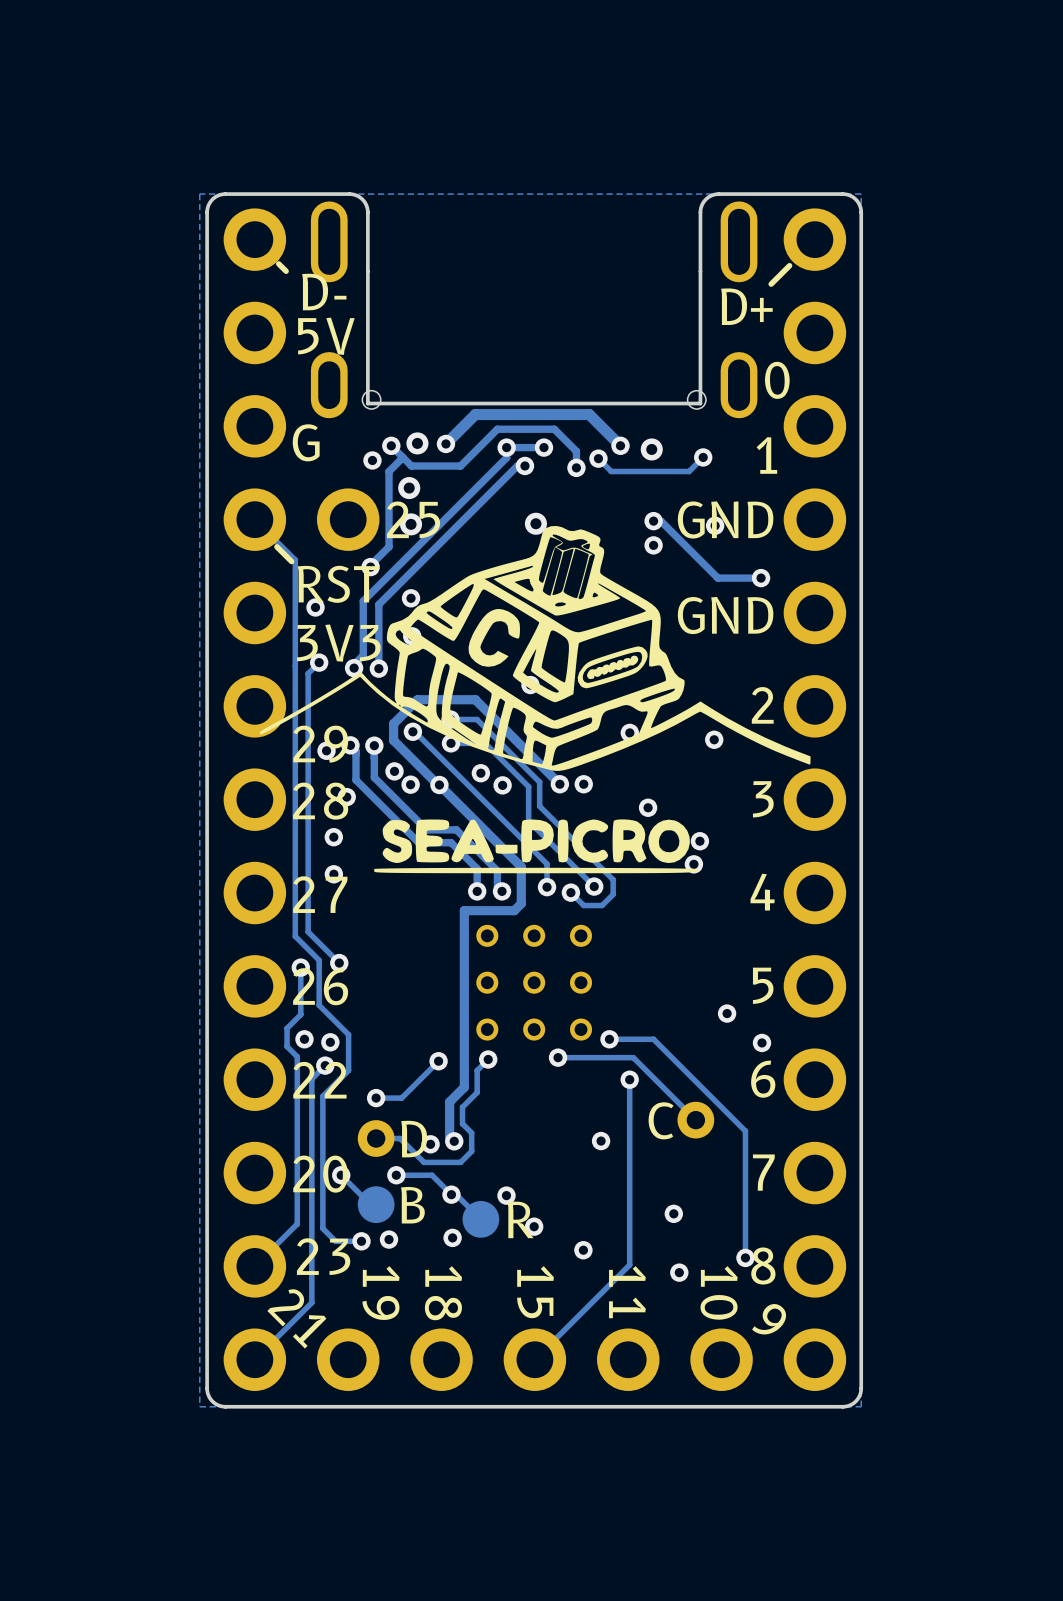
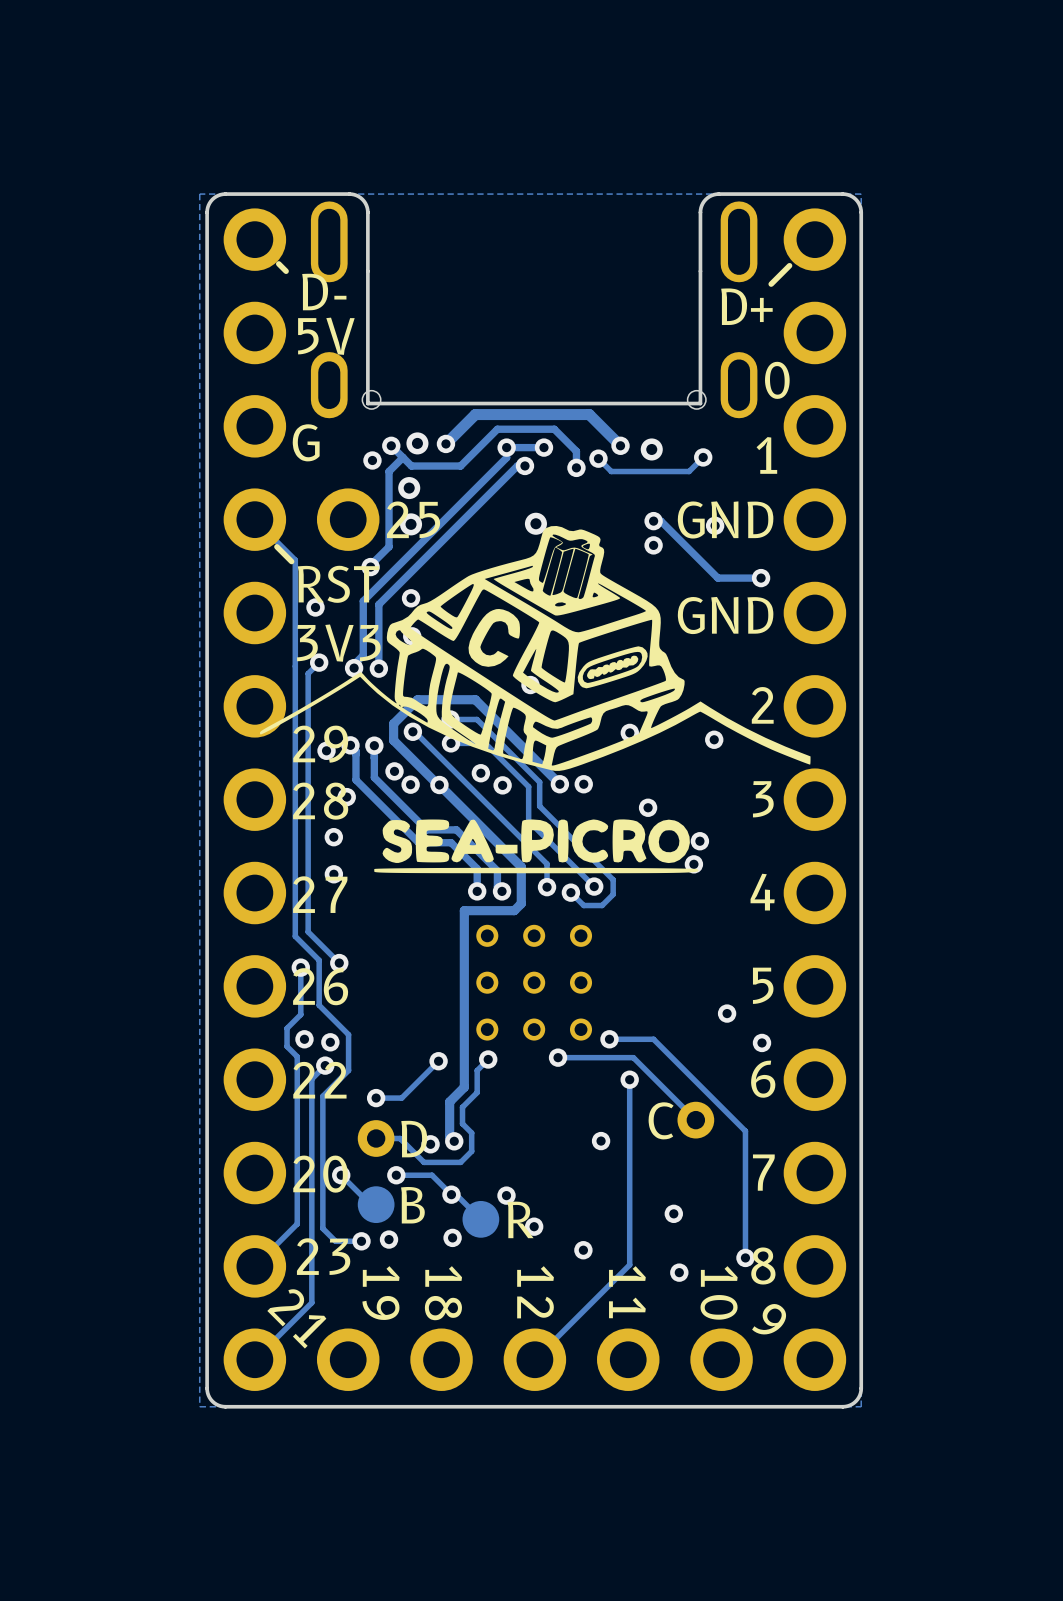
text: 15 (535, 1292) -> 12 (535, 1292)

